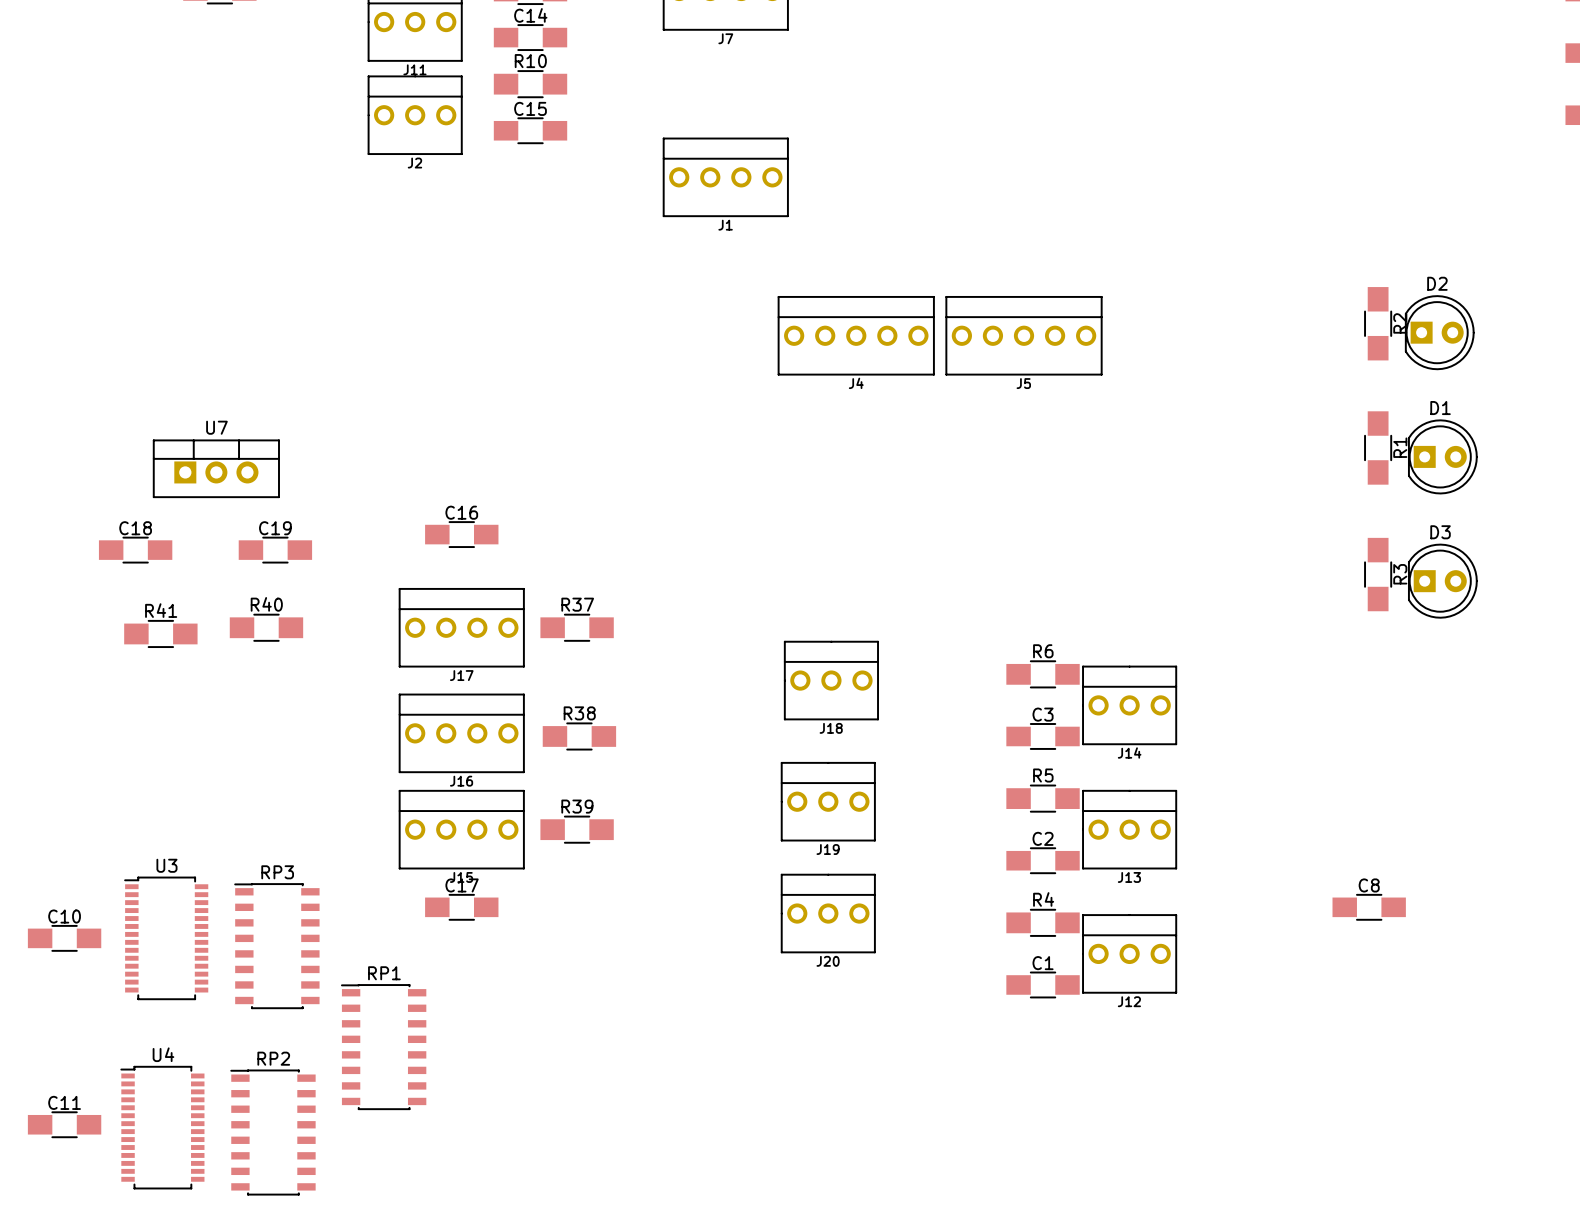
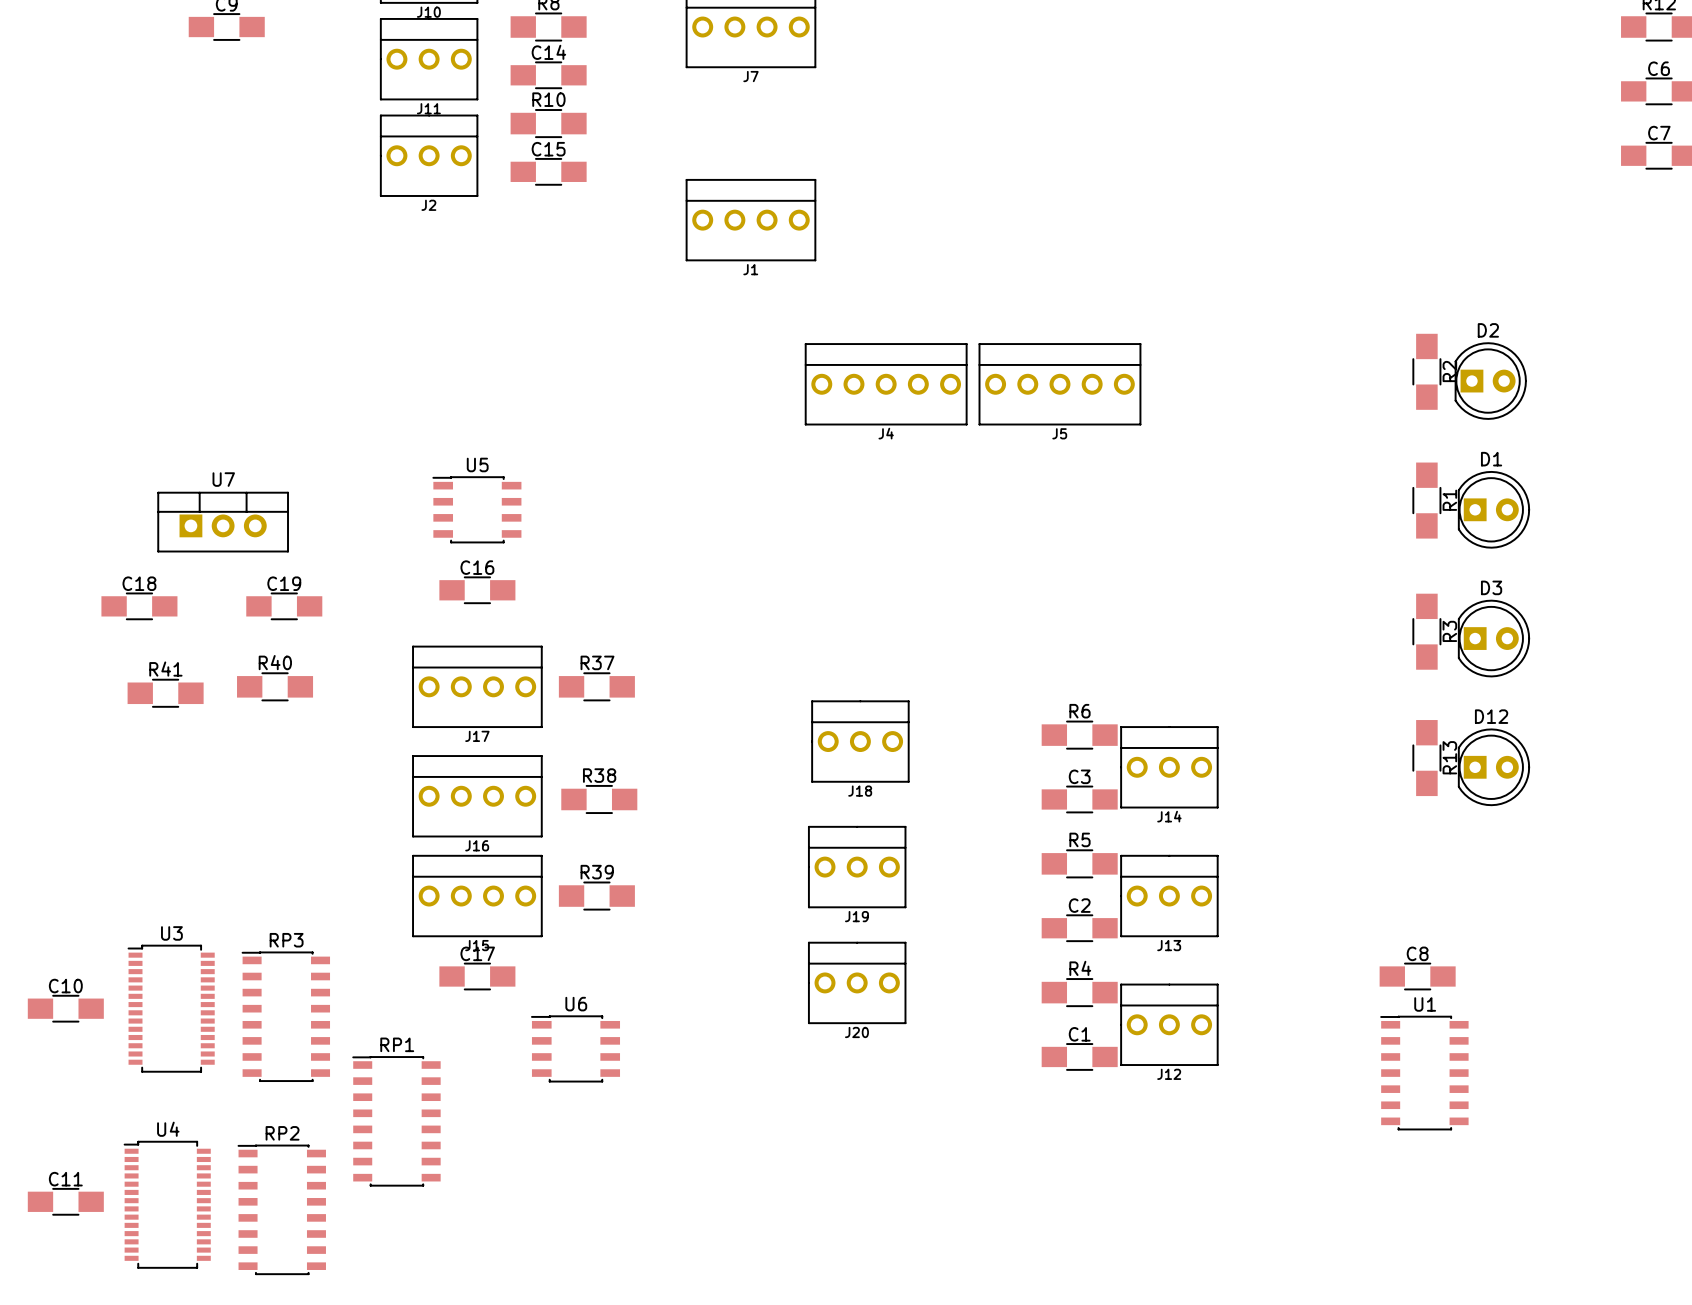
U5: none -> (476, 509)
R13: none -> (1426, 758)
D12: none -> (1493, 767)
U6: none -> (575, 1048)
U1: none -> (1424, 1073)

